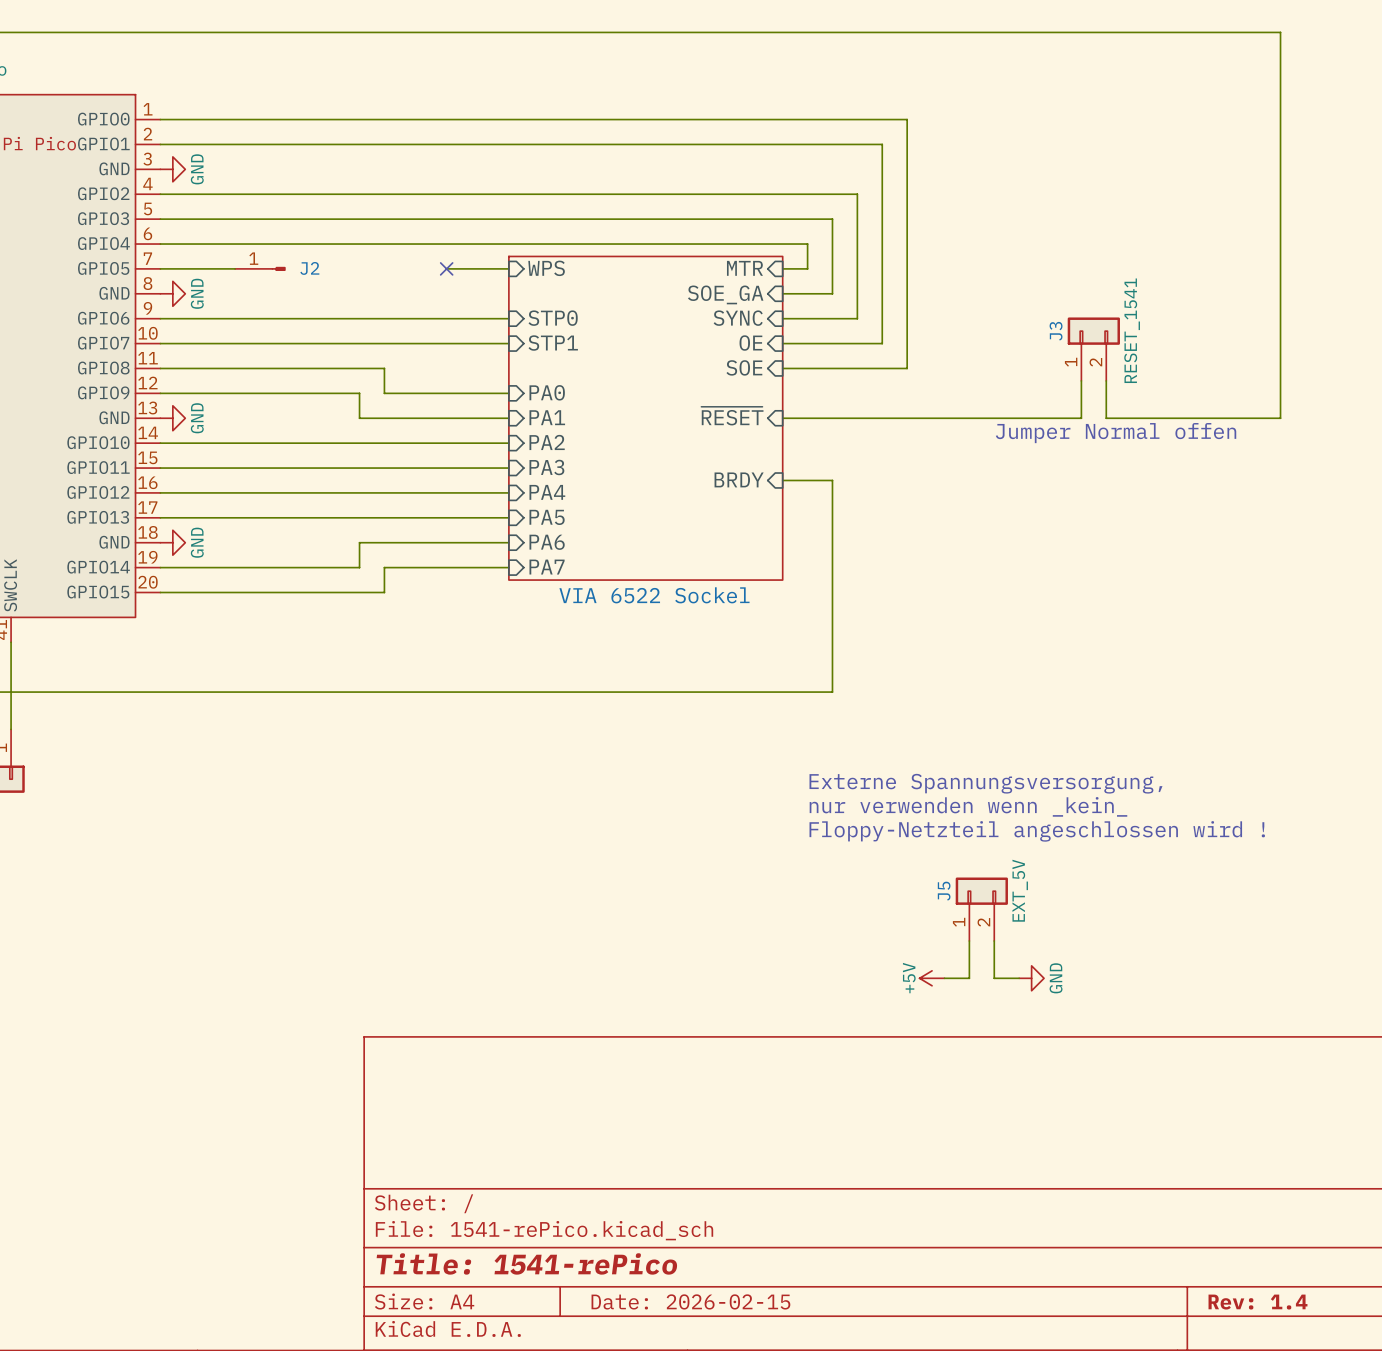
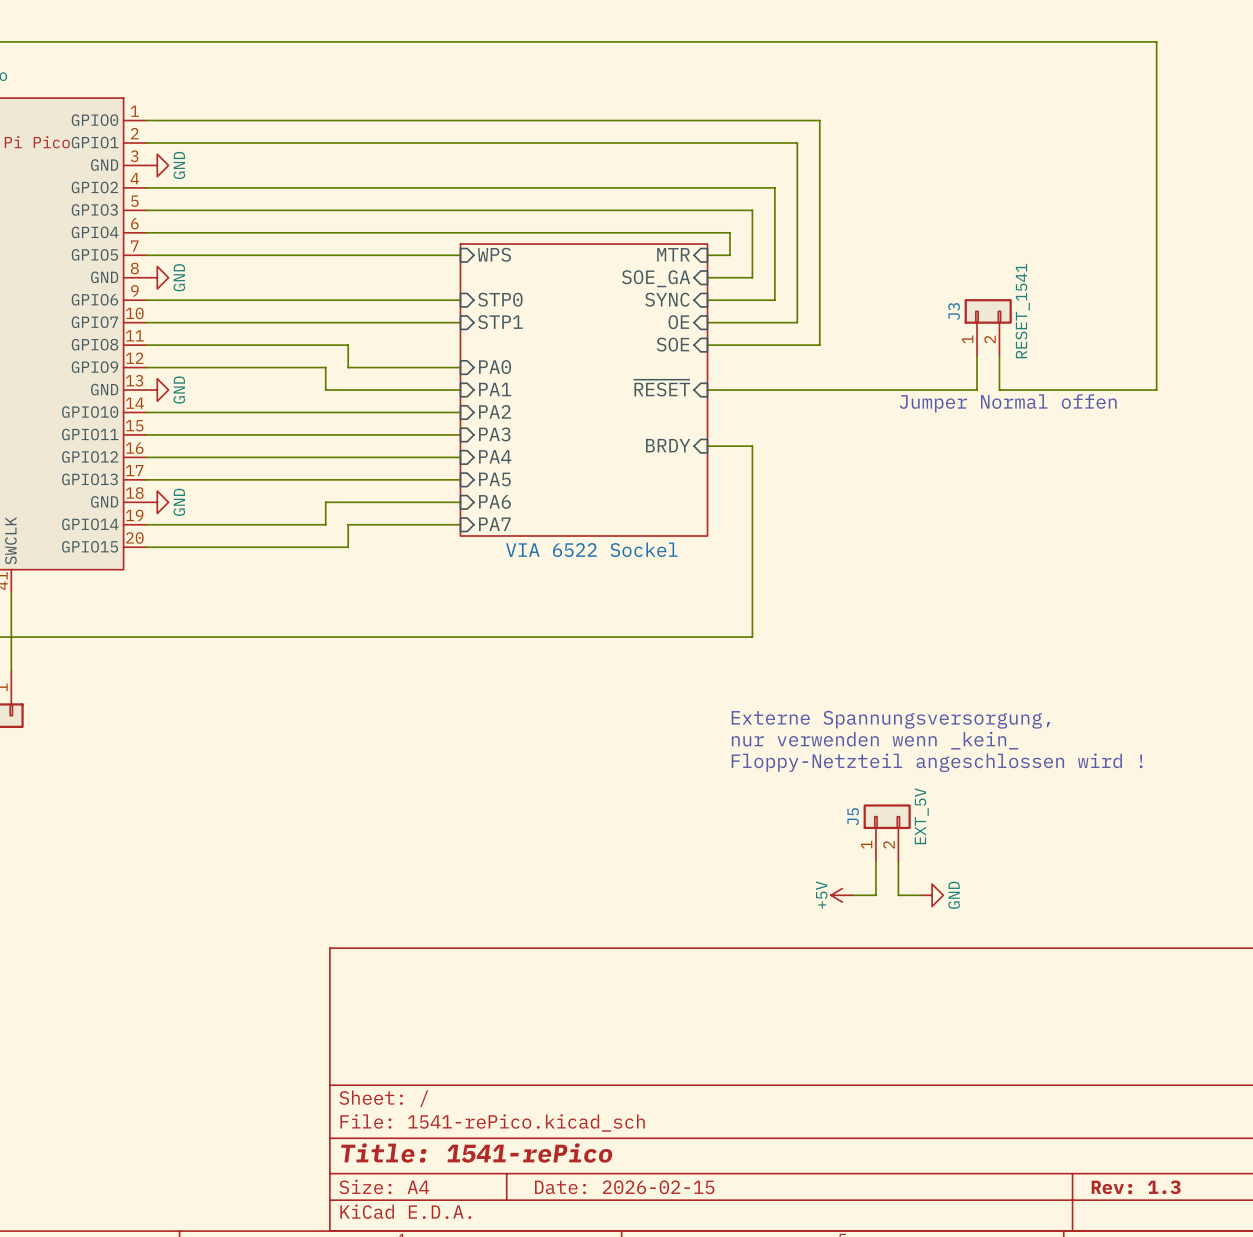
wire: none -> (213, 255) (404, 255)
J2: (260, 268) -> none
no-connect mark: (446, 268) -> none
title block: Rev: 1.4 (1257, 1302) -> Rev: 1.3 (1136, 1187)

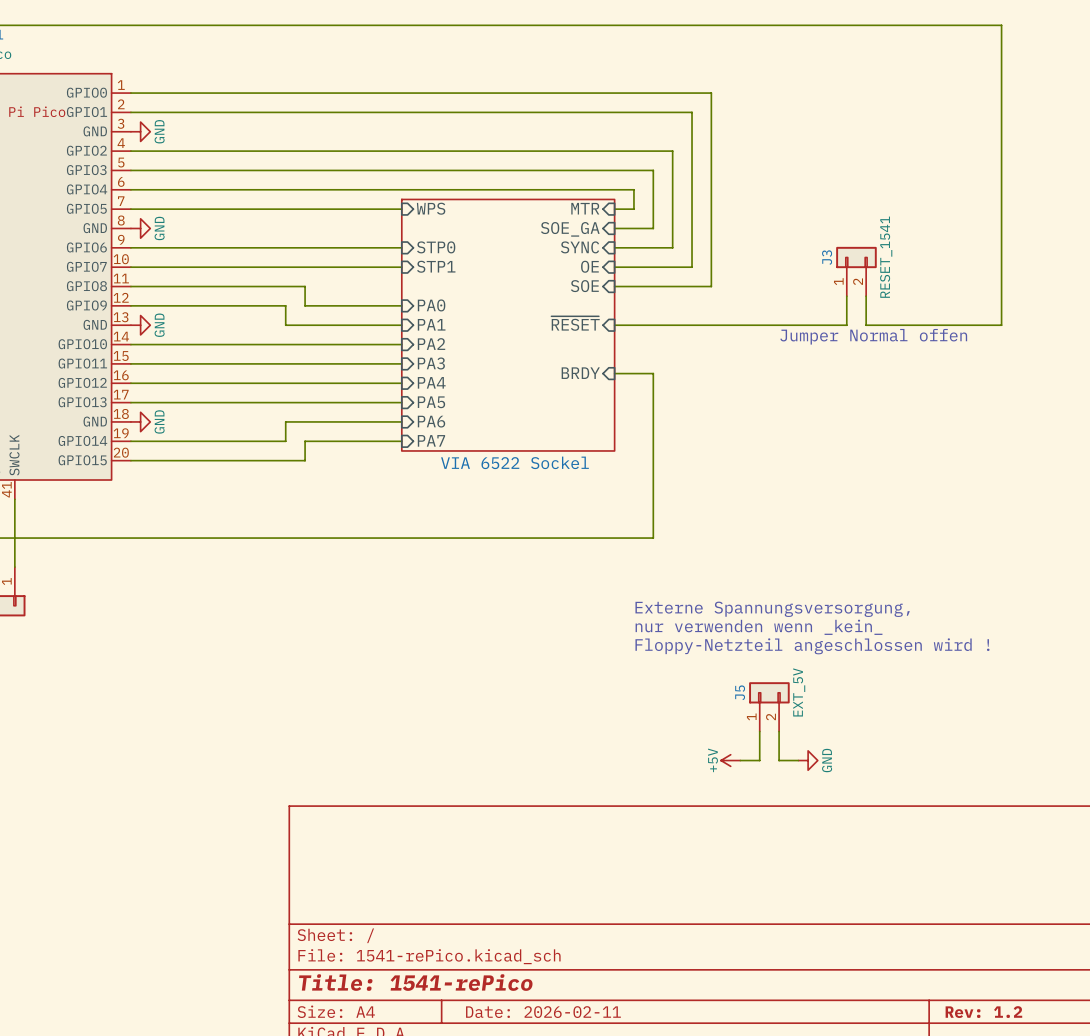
title block: Date: 2026-02-15 (624, 1187) -> Date: 2026-02-11 (543, 1012)
title block: Rev: 1.3 (1136, 1187) -> Rev: 1.2 (983, 1012)

